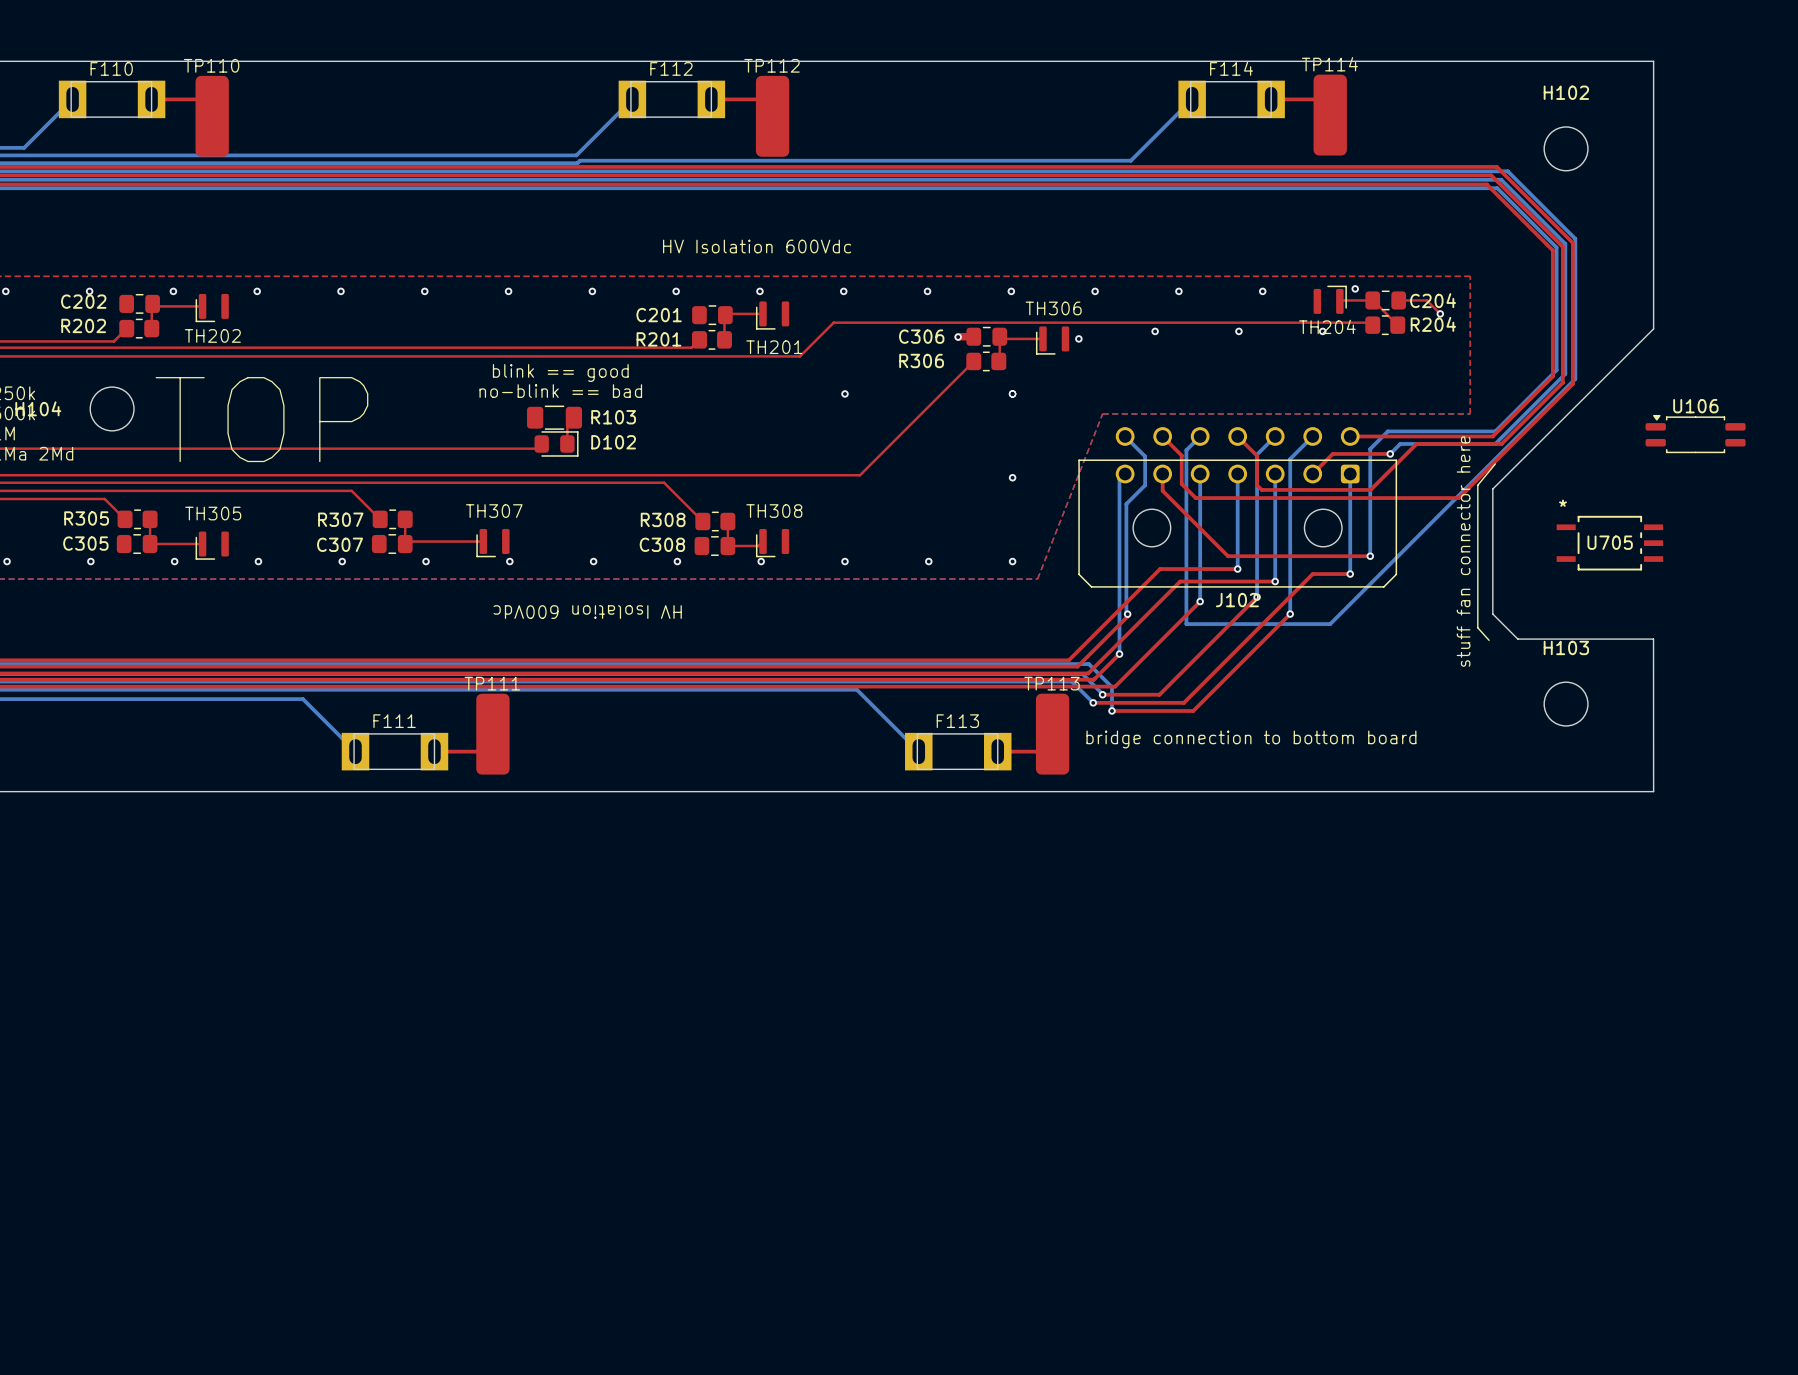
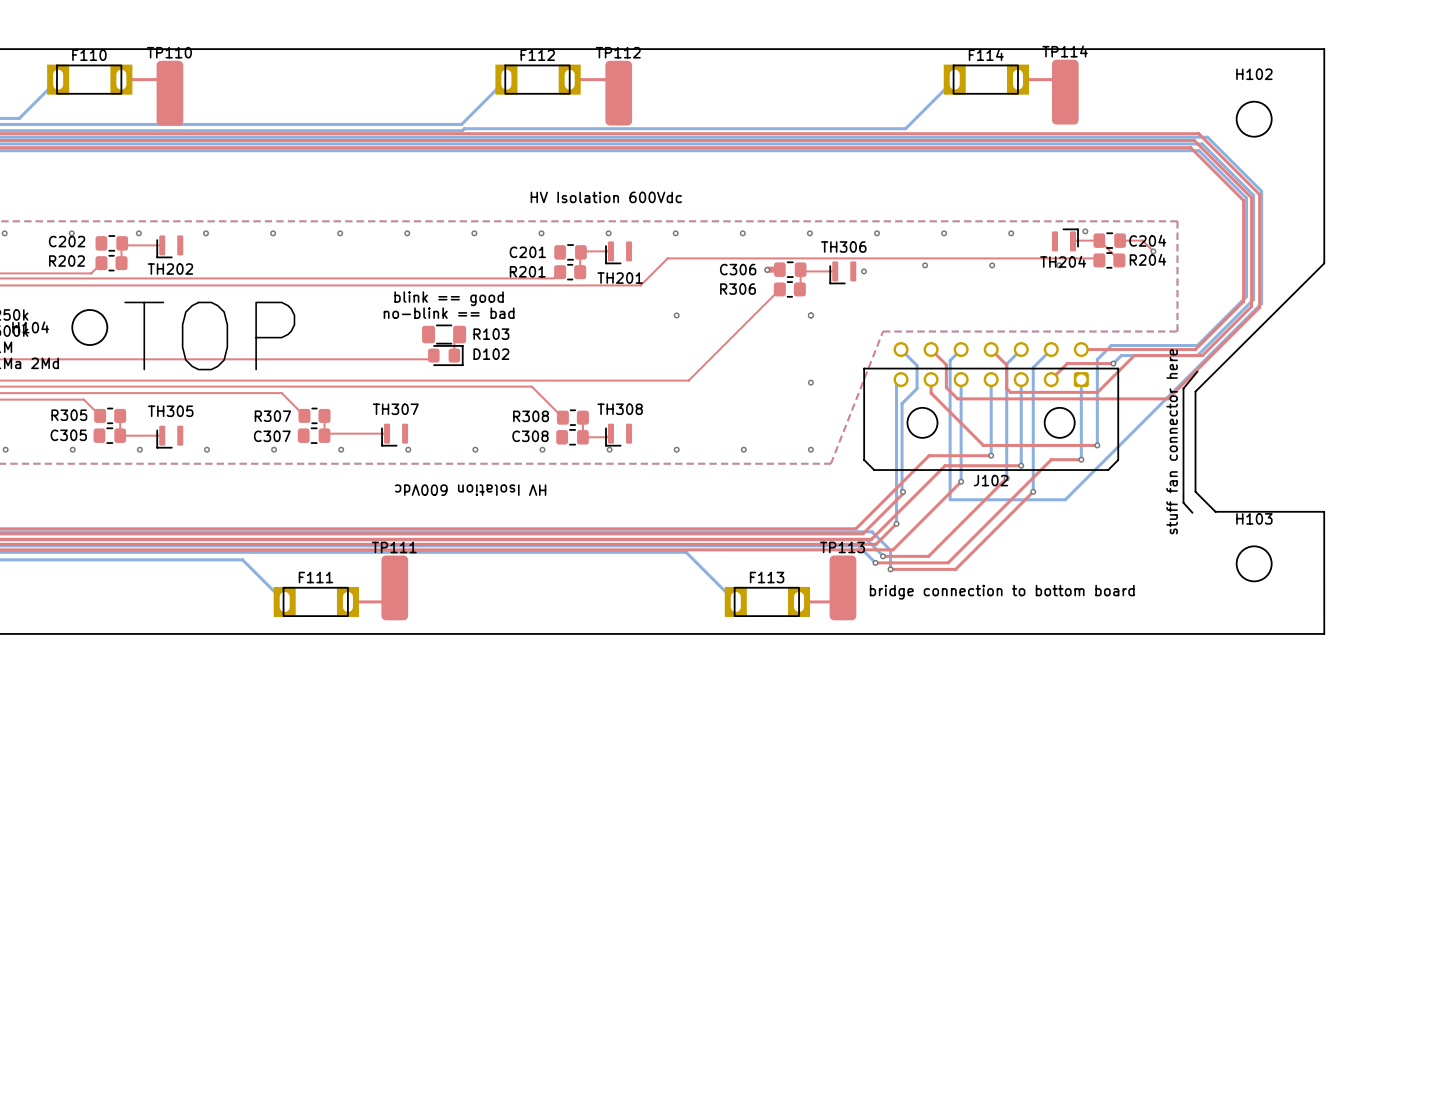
U106: (1695, 434) -> none
U705: (1609, 543) -> none

